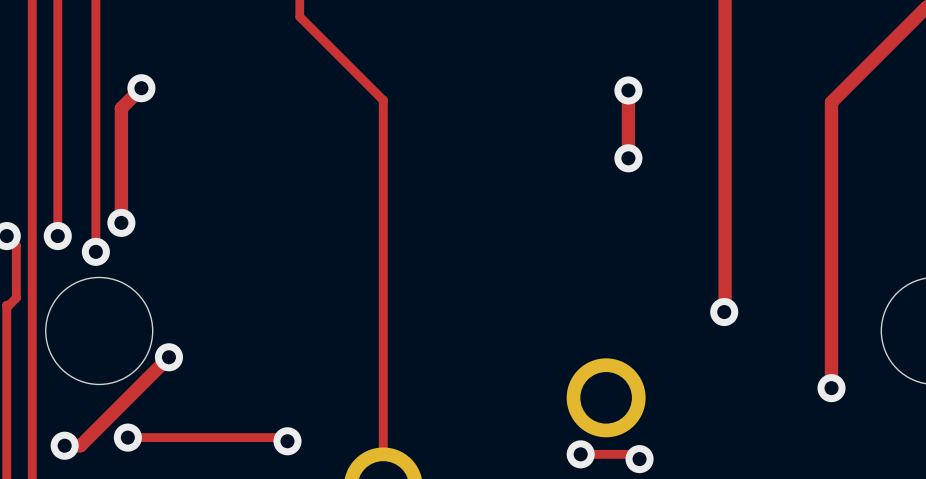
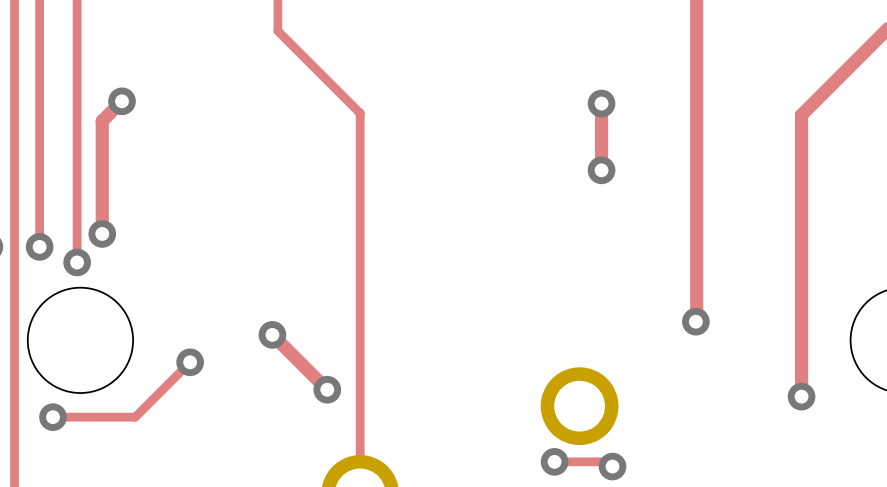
track: none -> (272, 334) (327, 389)
via: none -> (272, 334)
track: none -> (190, 362) (135, 417) (53, 417)
track: (168, 357) (80, 445) (64, 445) -> none
via position: (168, 357) -> (190, 362)
via: none -> (327, 389)
via: none -> (53, 417)
track: (127, 437) (283, 437) (287, 441) -> none
via: (127, 437) -> none
via: (287, 441) -> none
via: (64, 445) -> none

